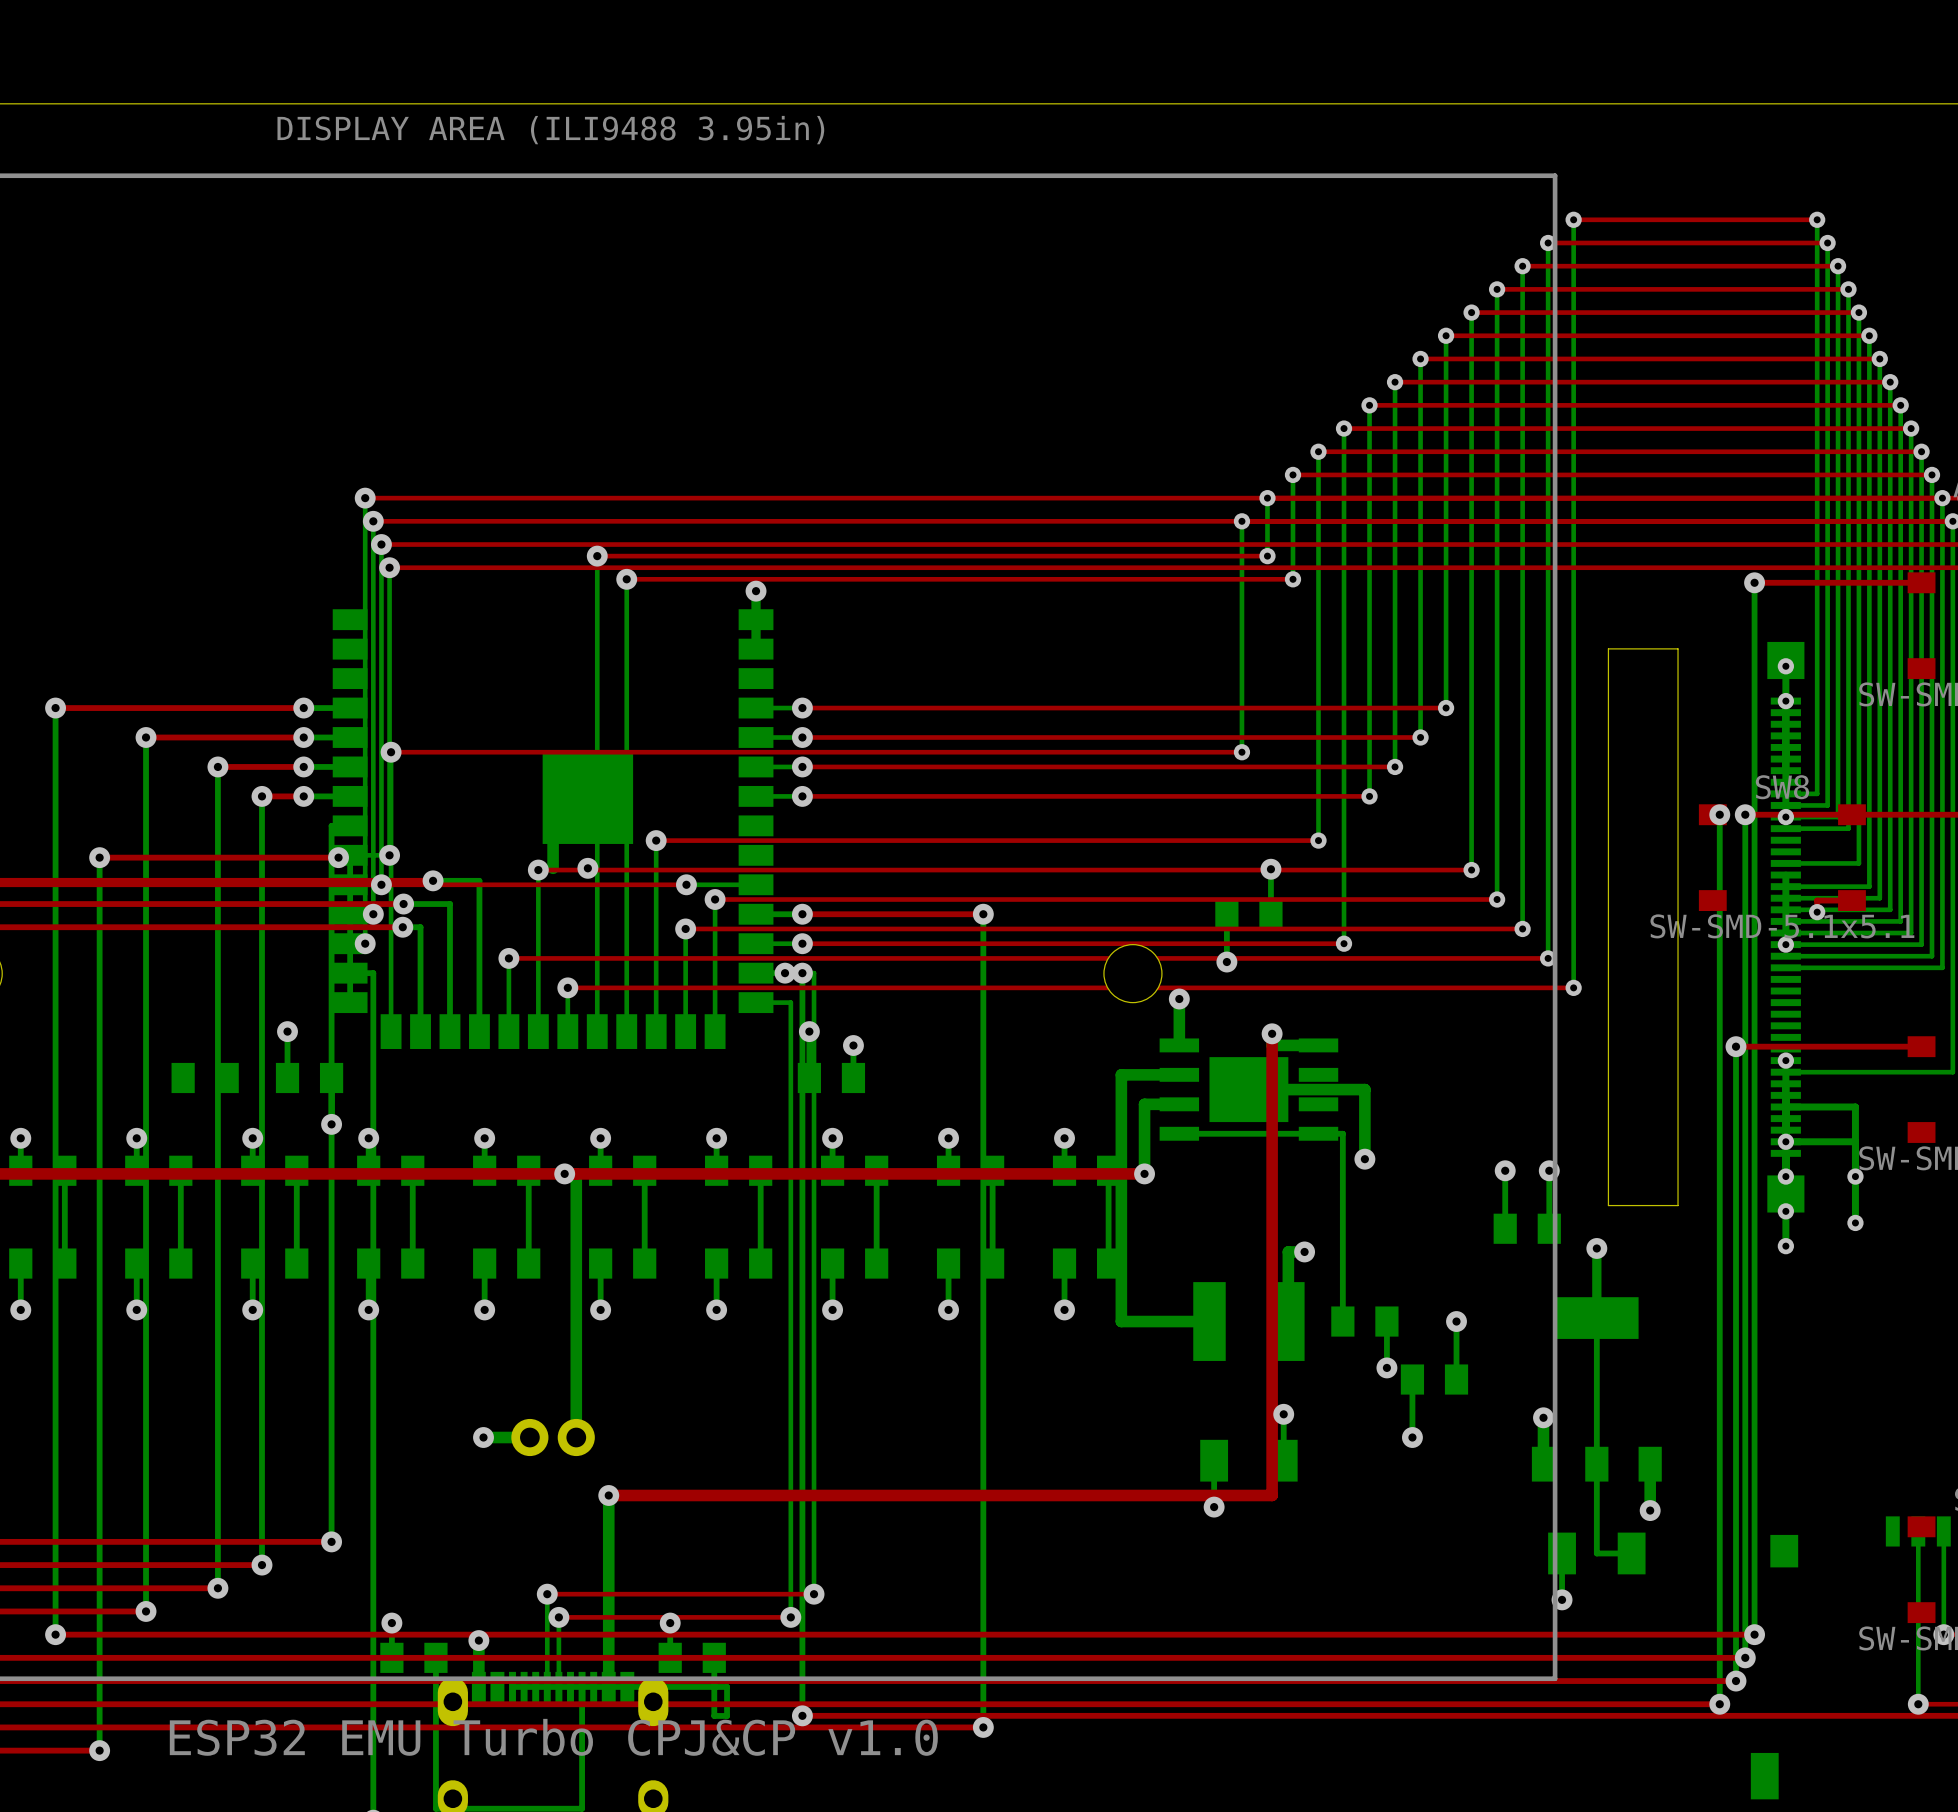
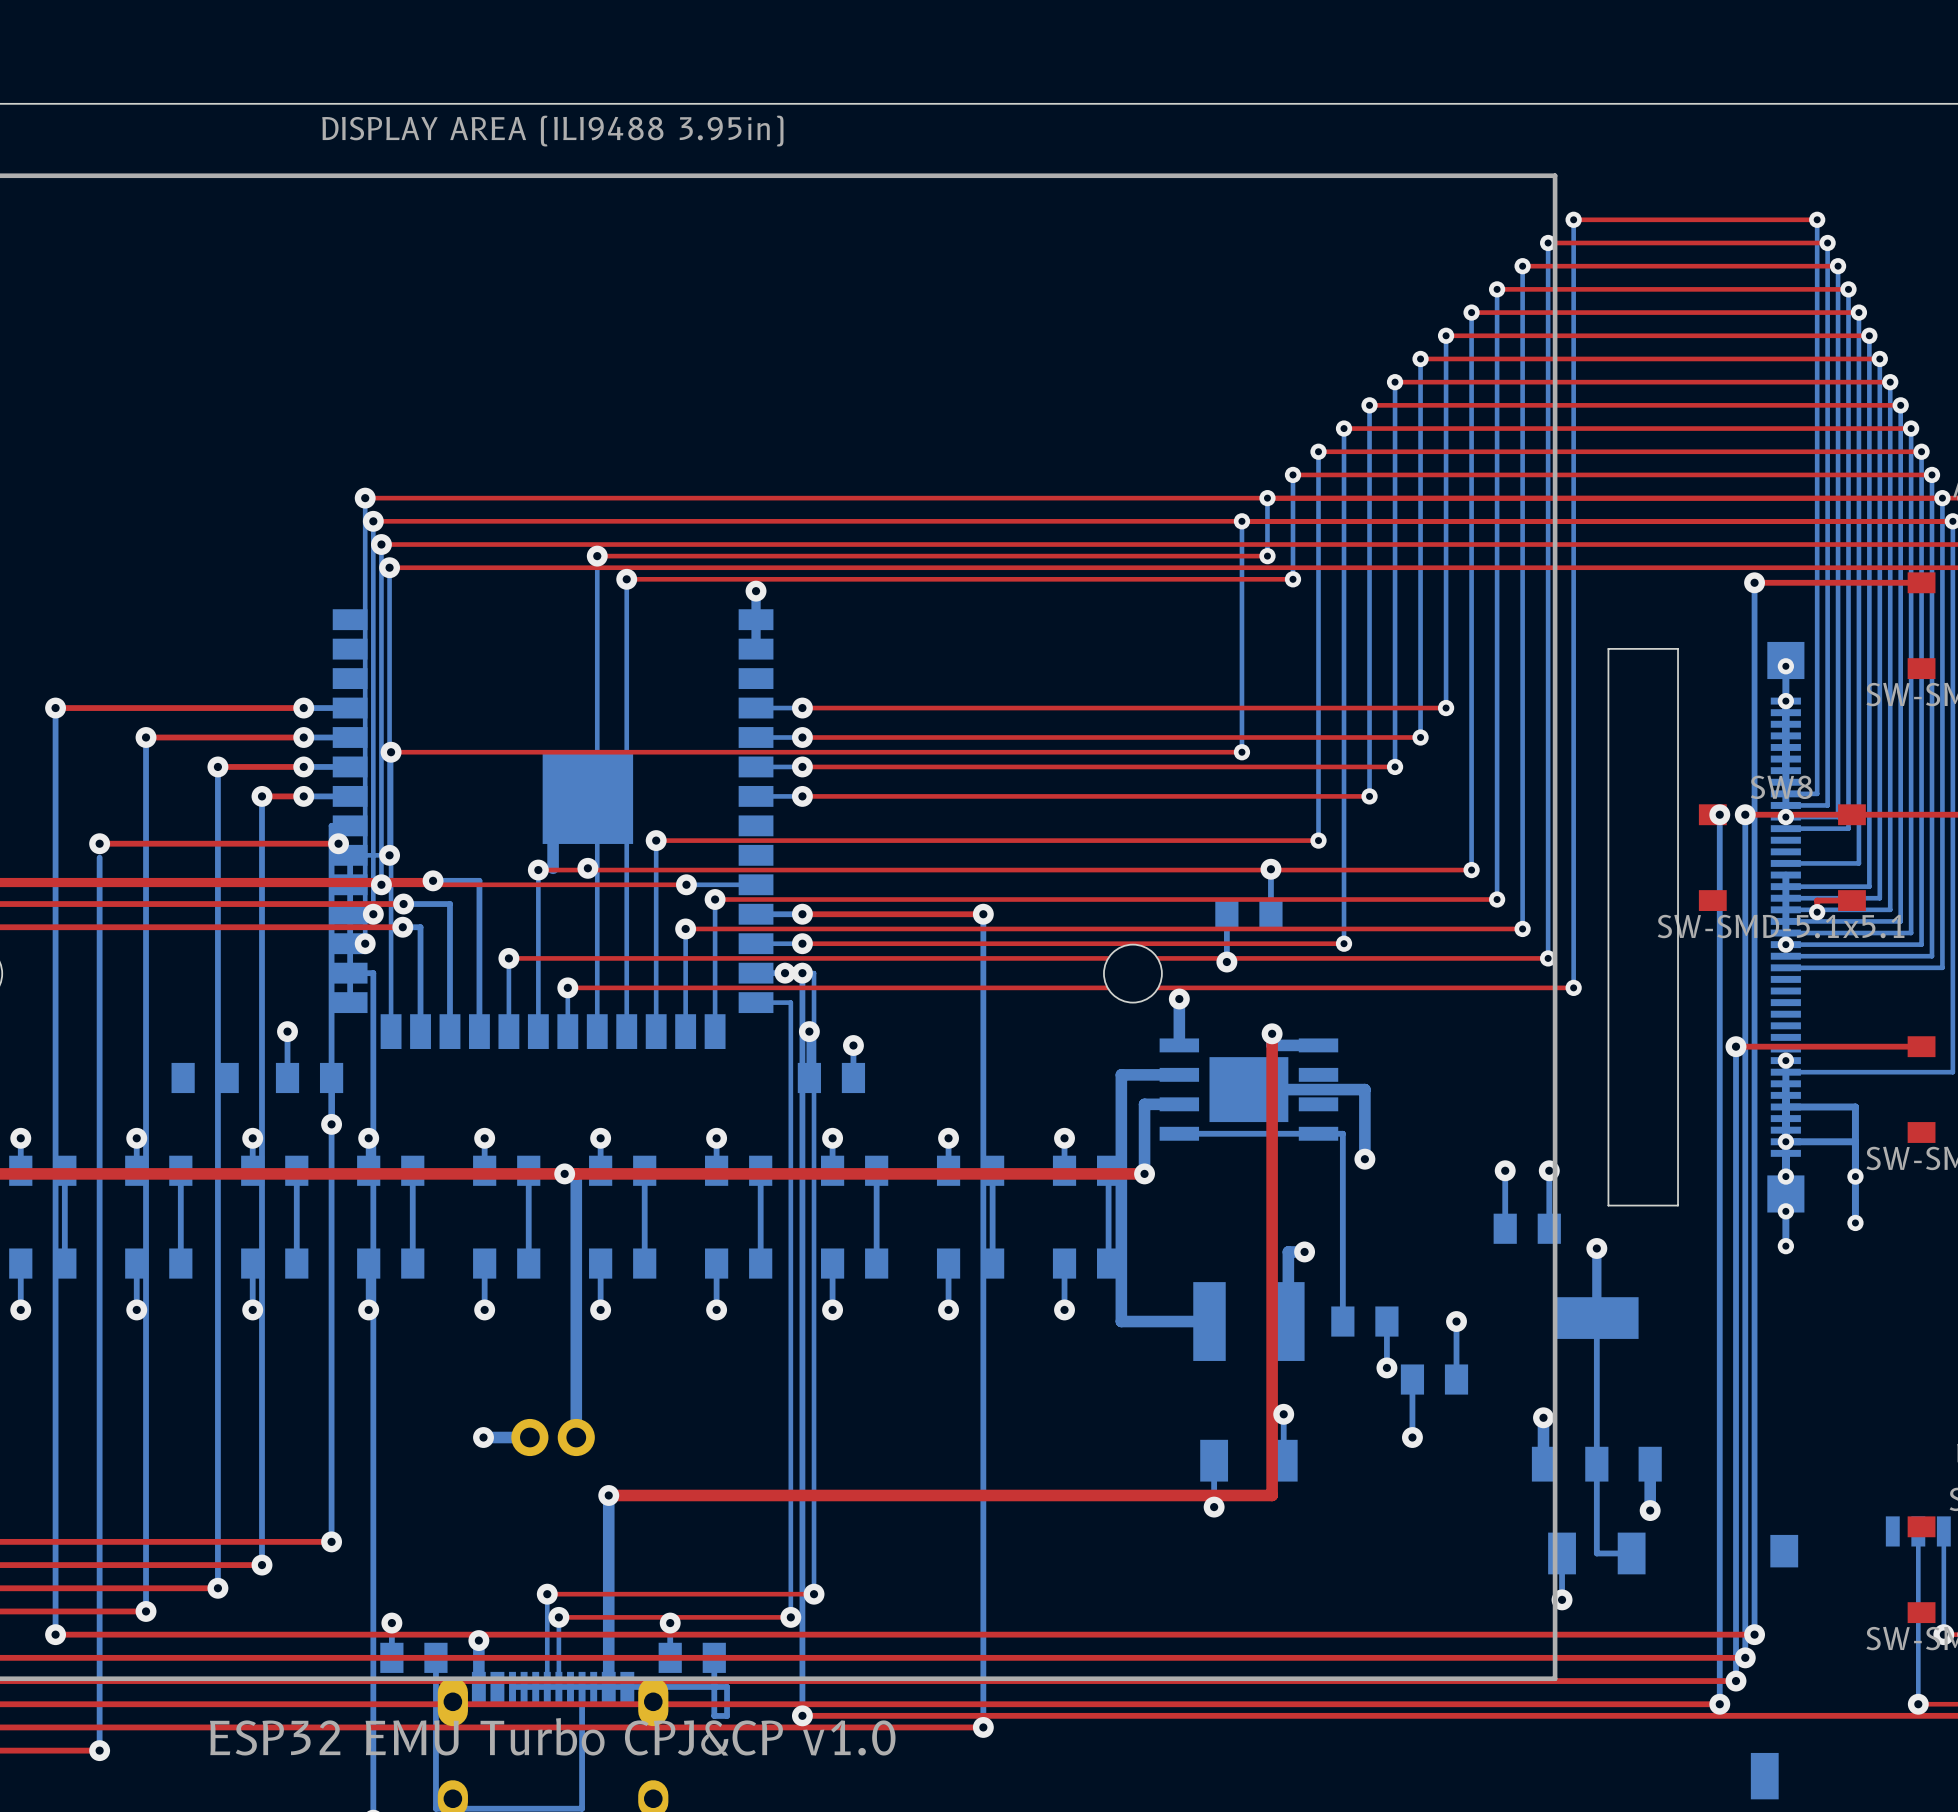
top track: (99, 857) (338, 857) -> (99, 843) (338, 843)
via position: (99, 857) -> (99, 843)
via position: (338, 857) -> (338, 843)

